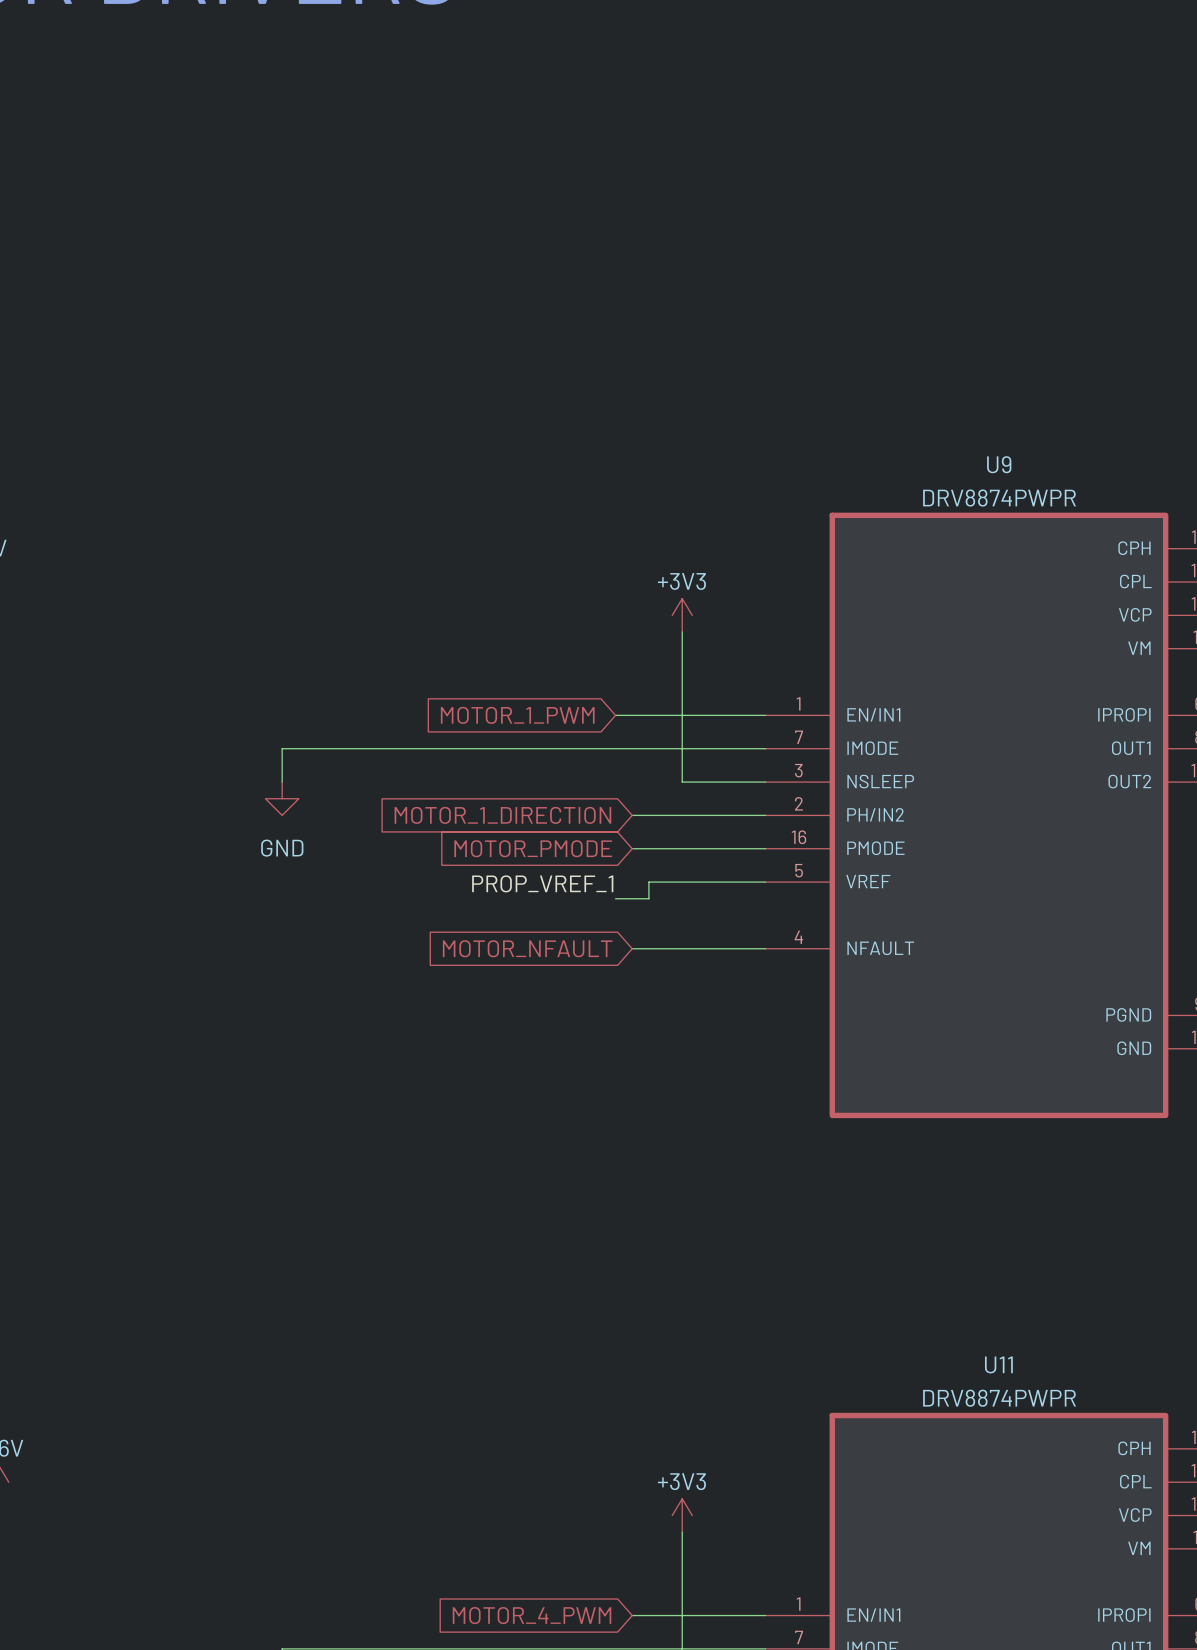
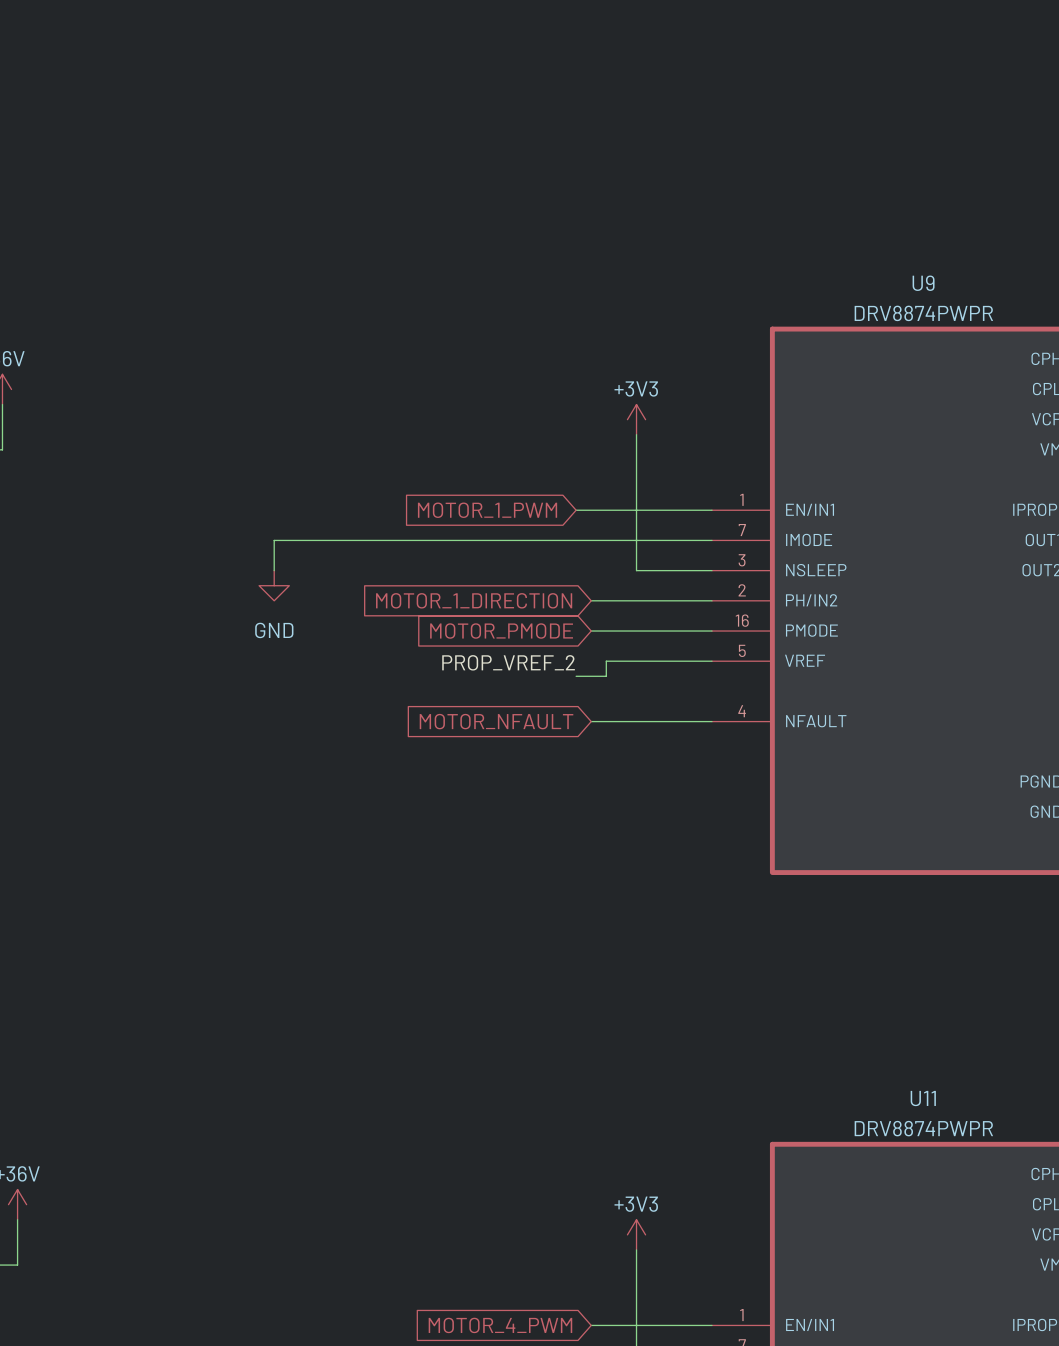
label: PROP_VREF_1 (542, 883) -> PROP_VREF_2 (508, 662)

